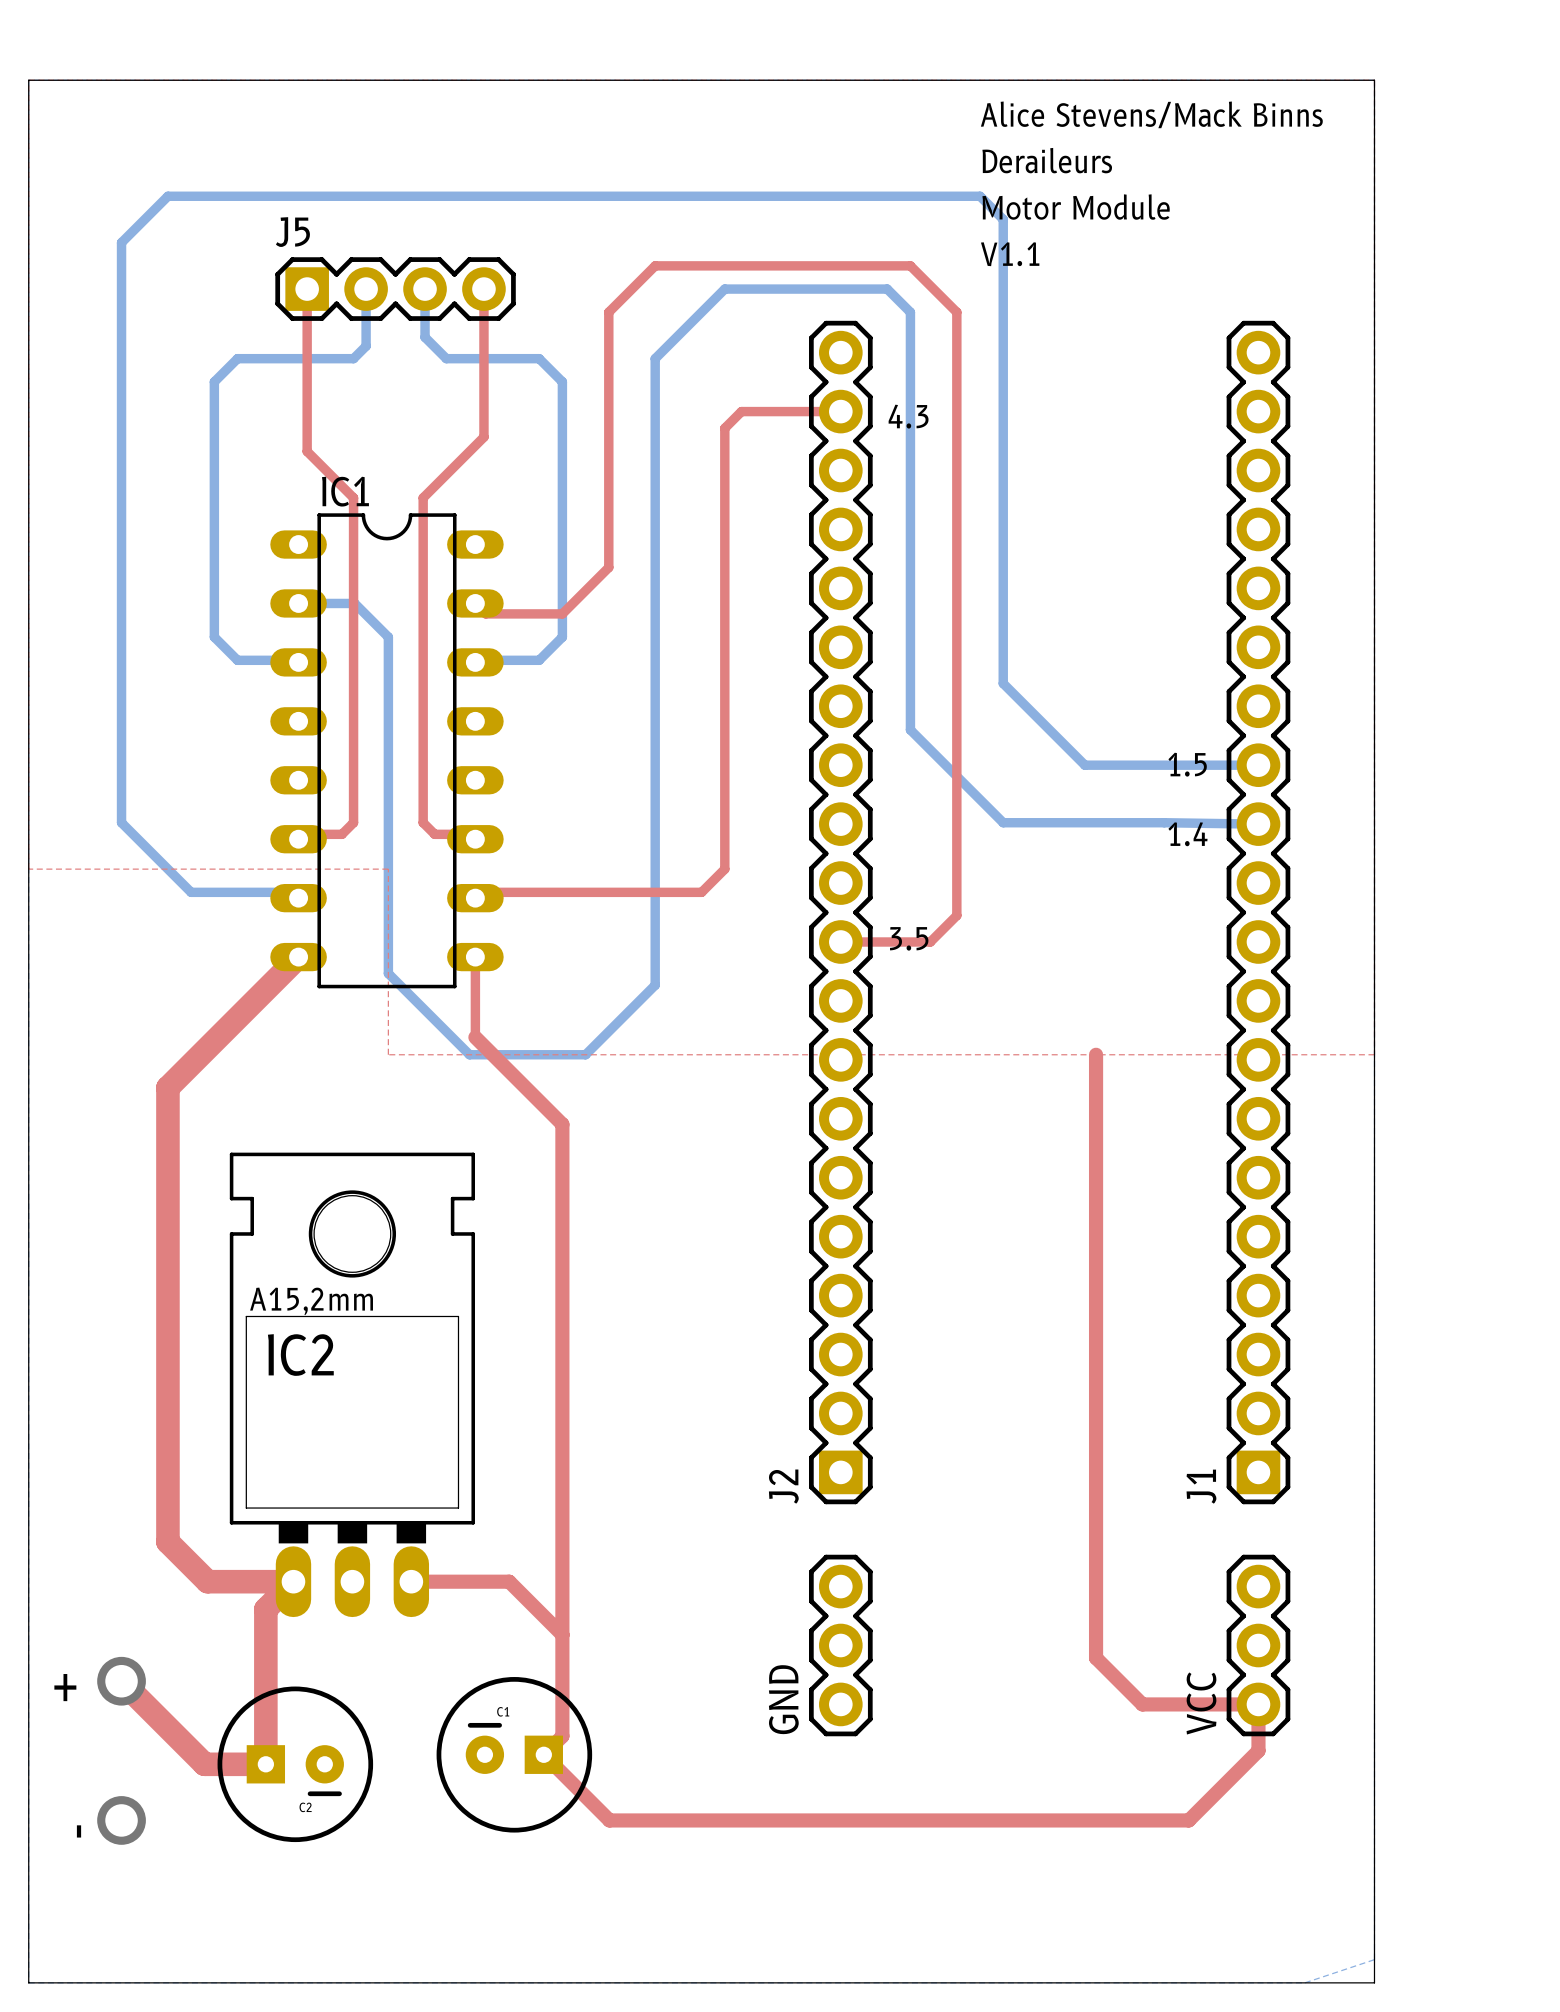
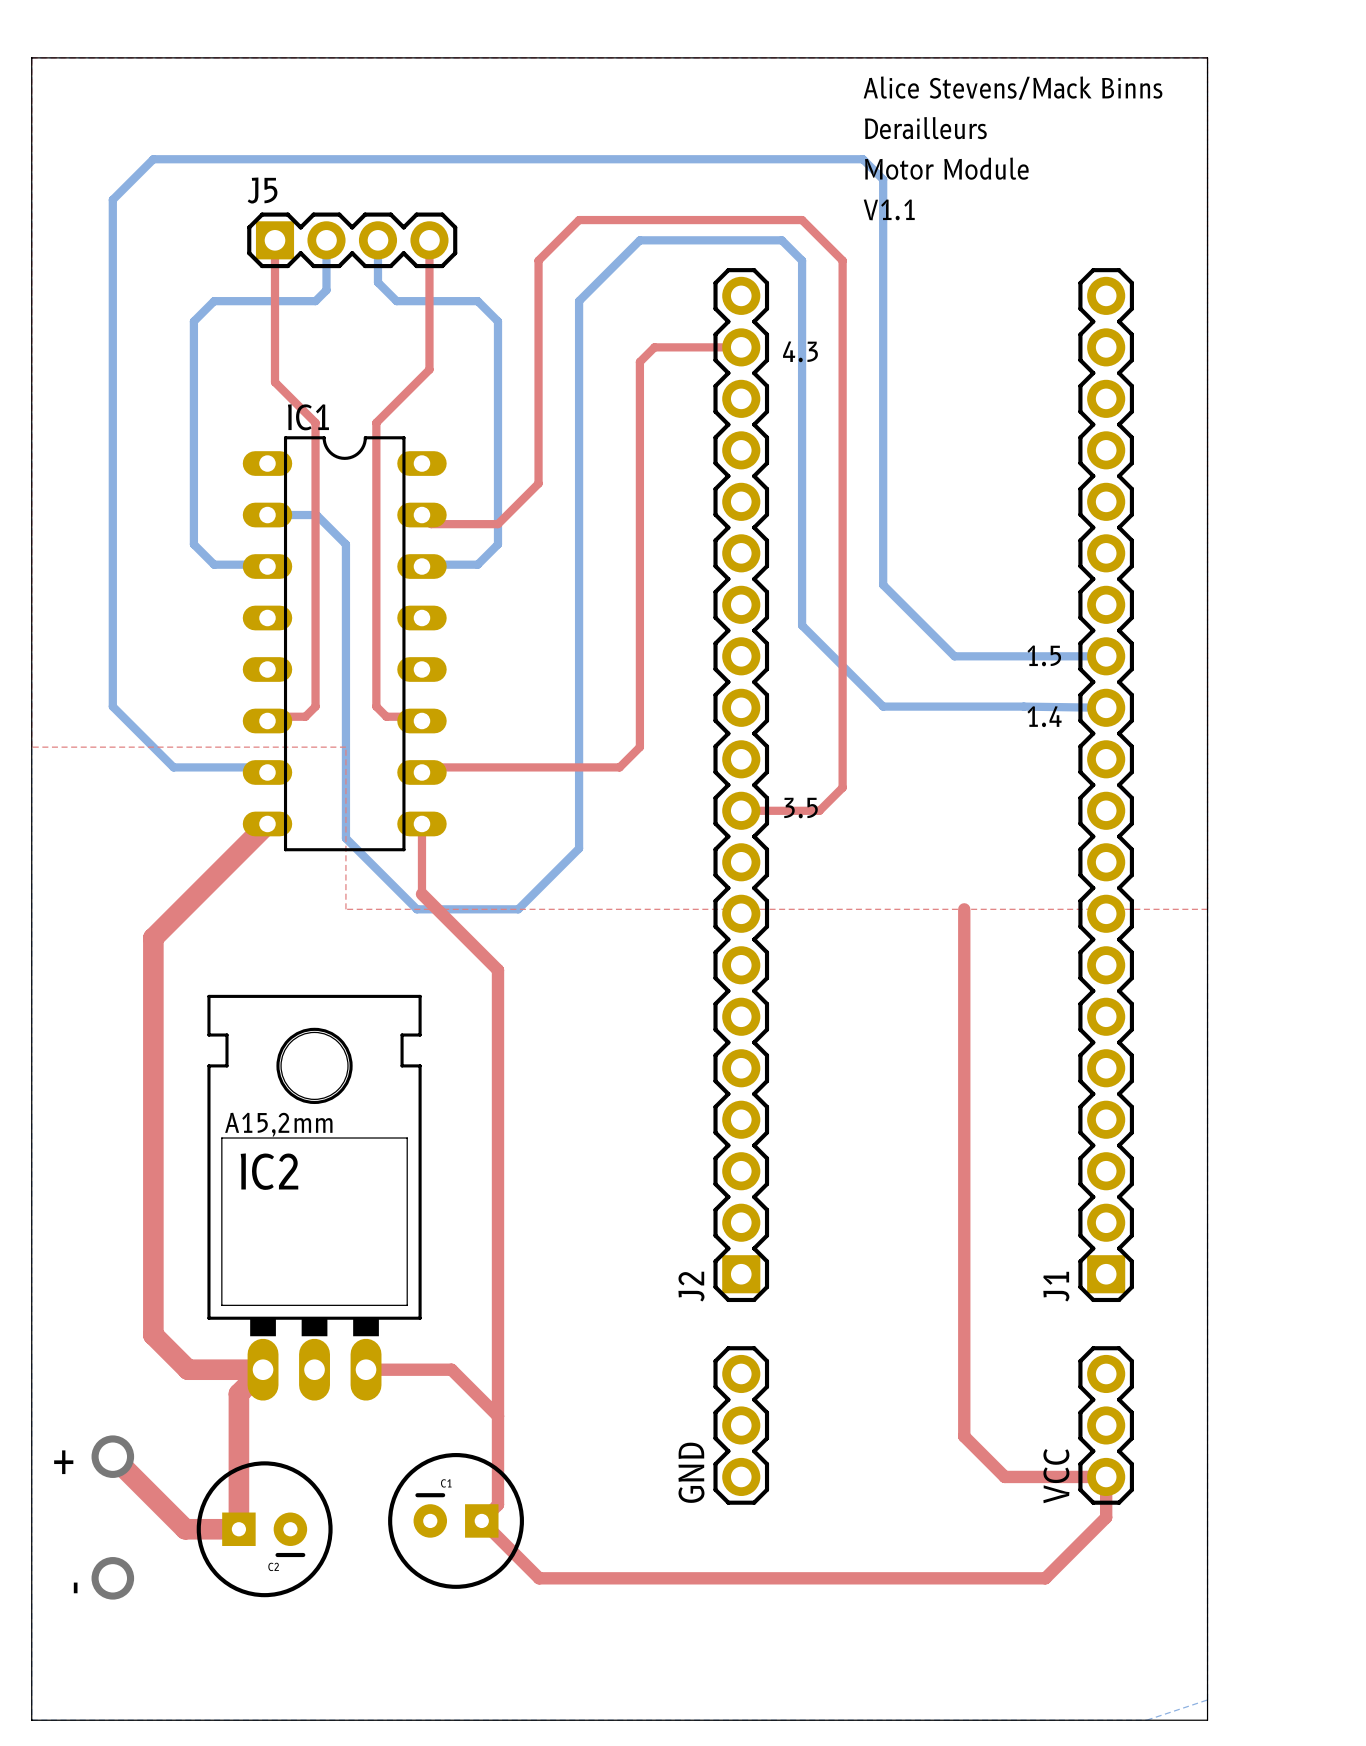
text: Deraileurs (1047, 160) -> Derailleurs (925, 128)

